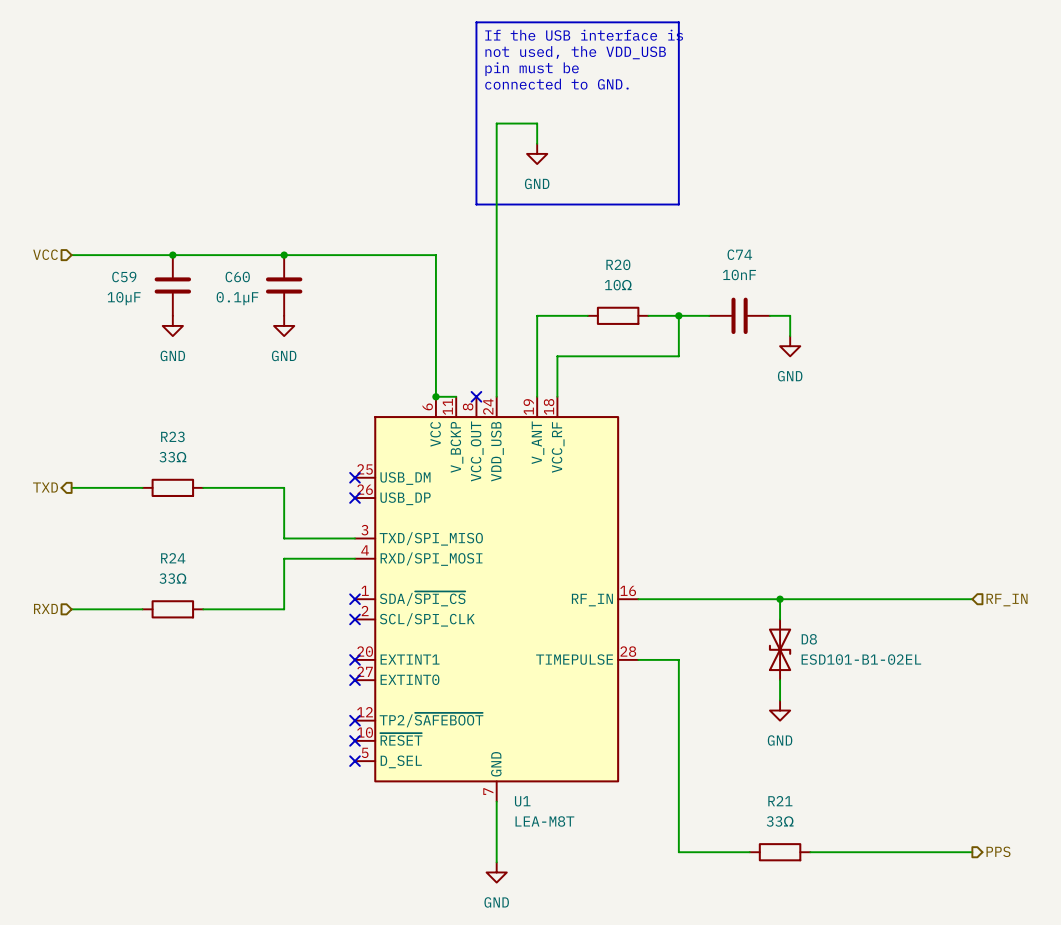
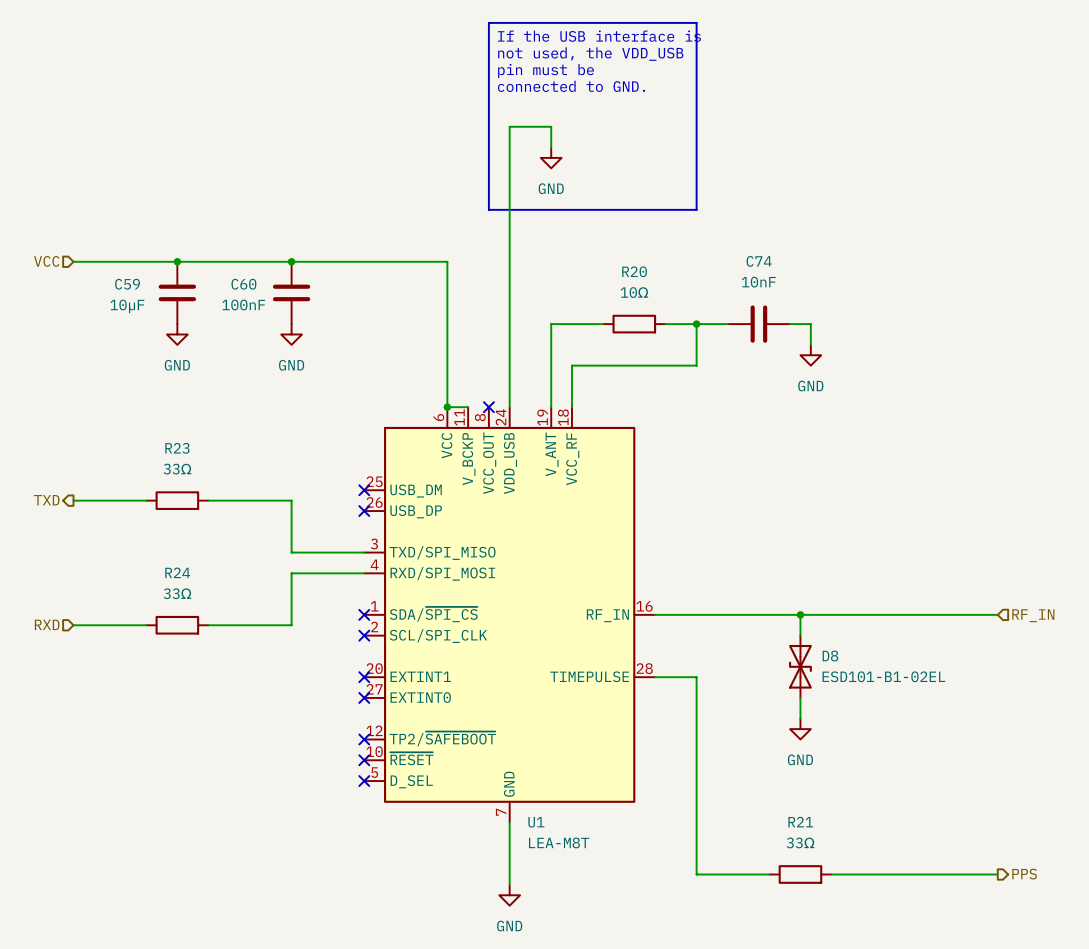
C60 value: 0.1µF (237, 298) -> 100nF (243, 305)

